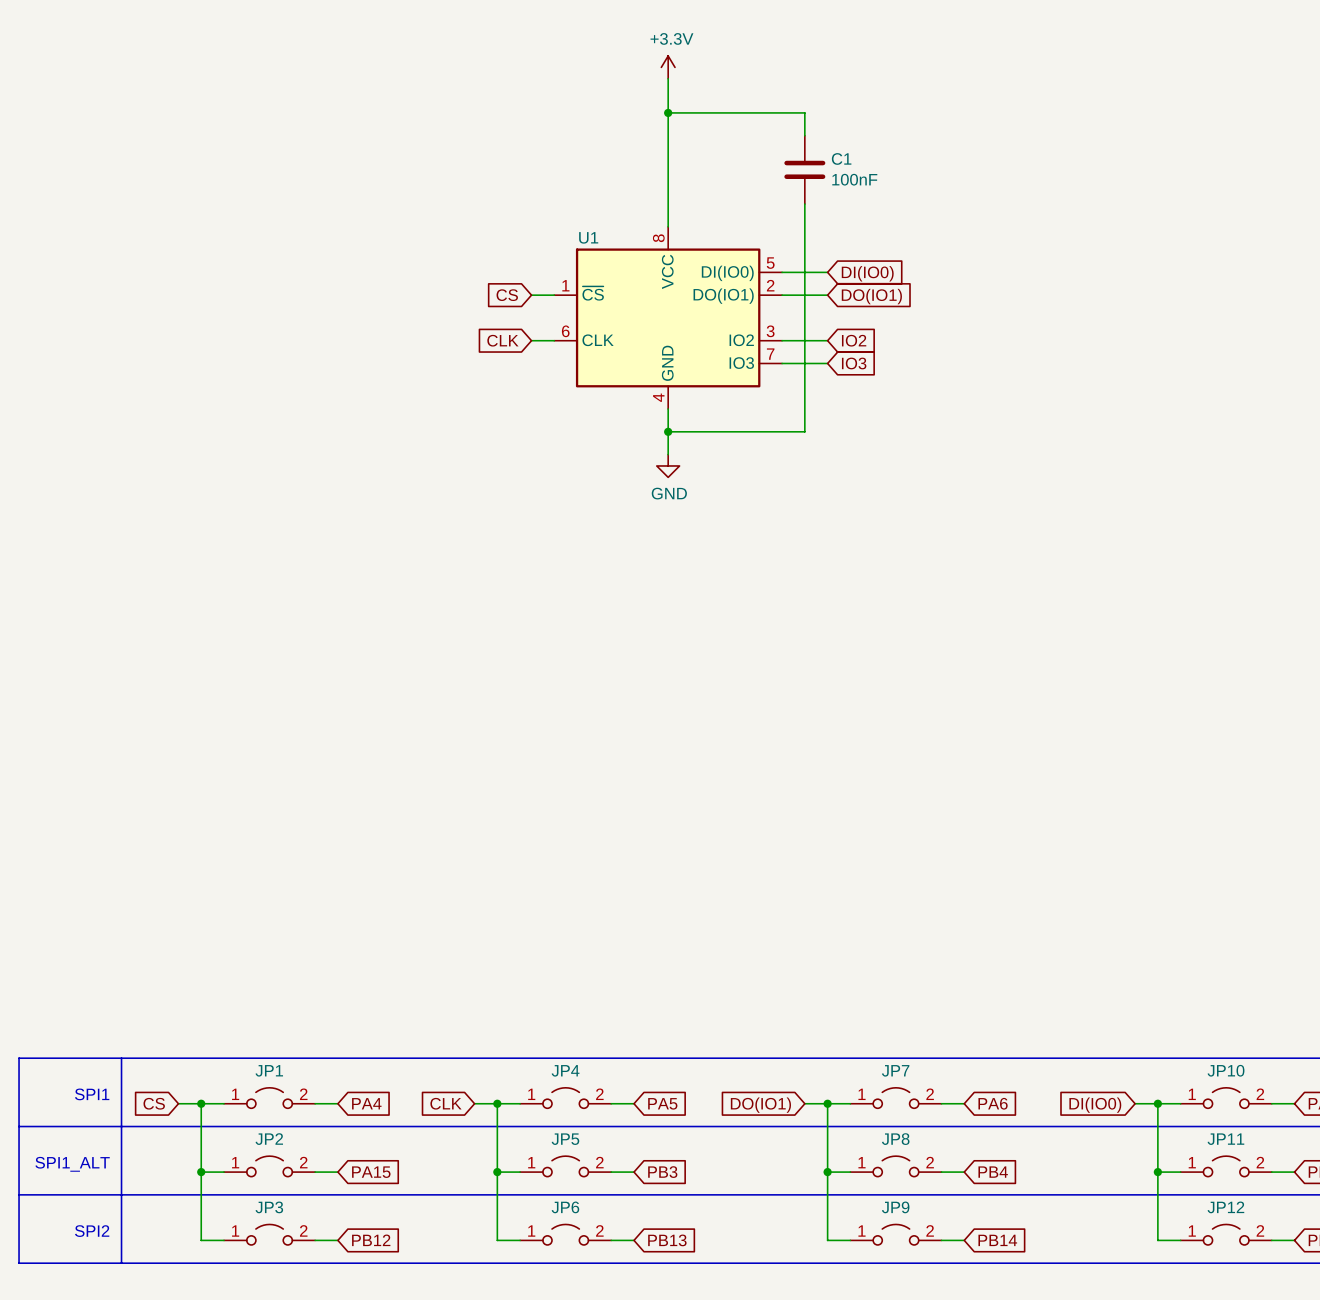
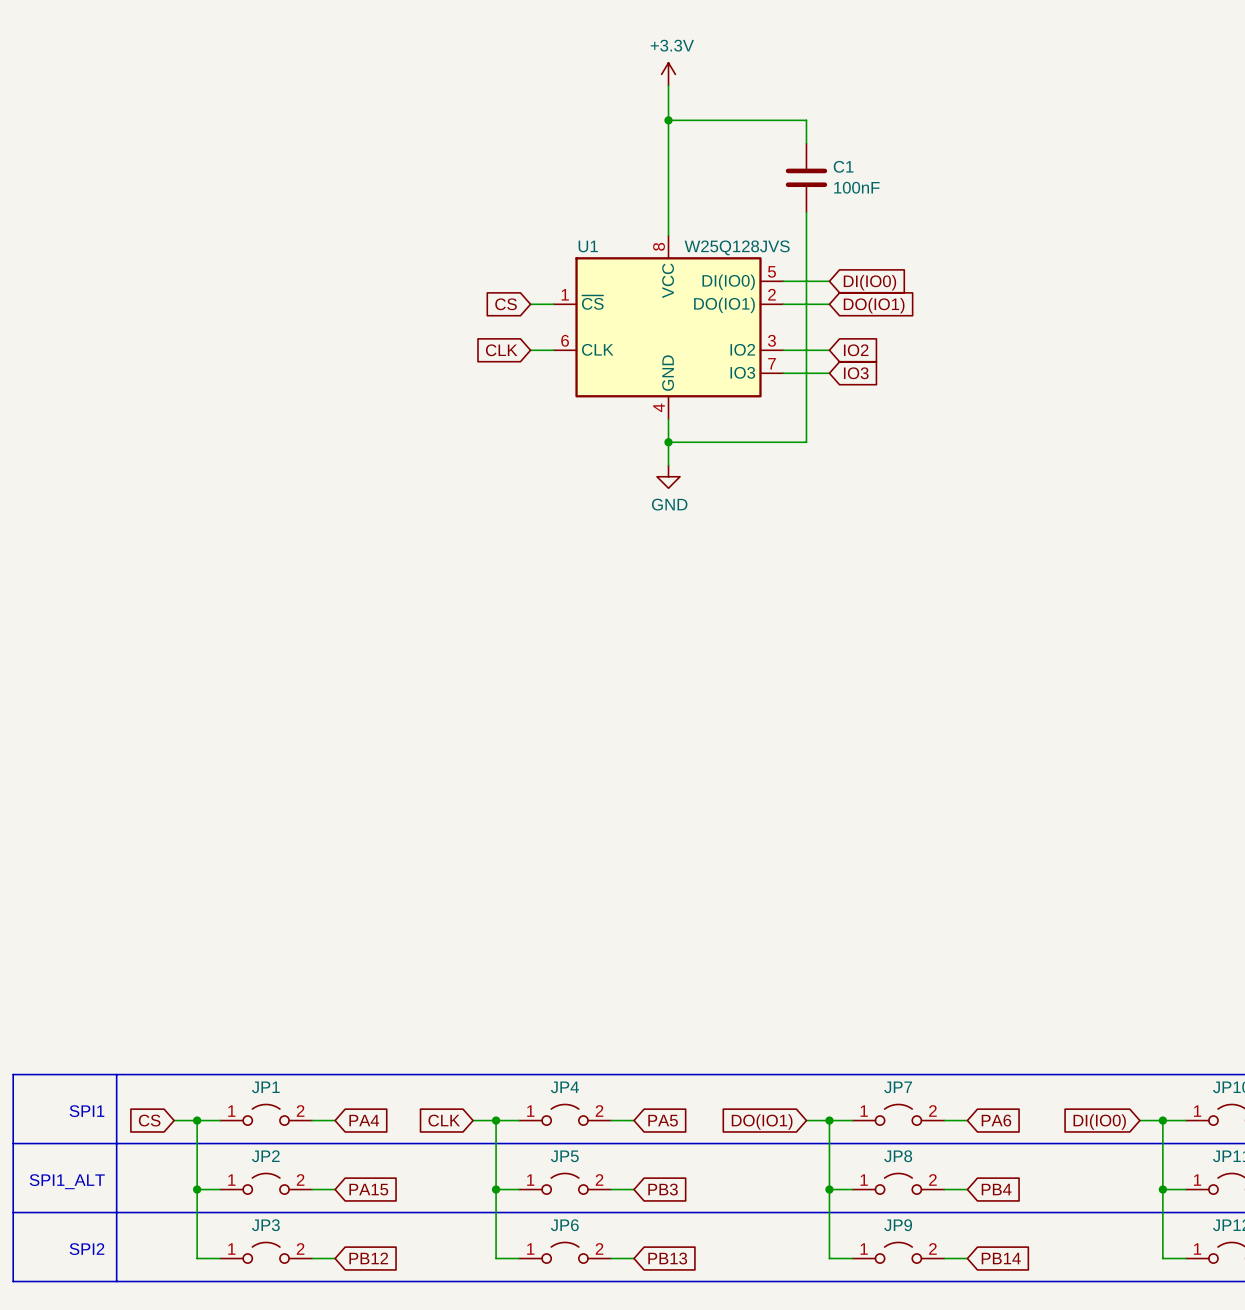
U1 value: none -> W25Q128JVS (737, 247)

